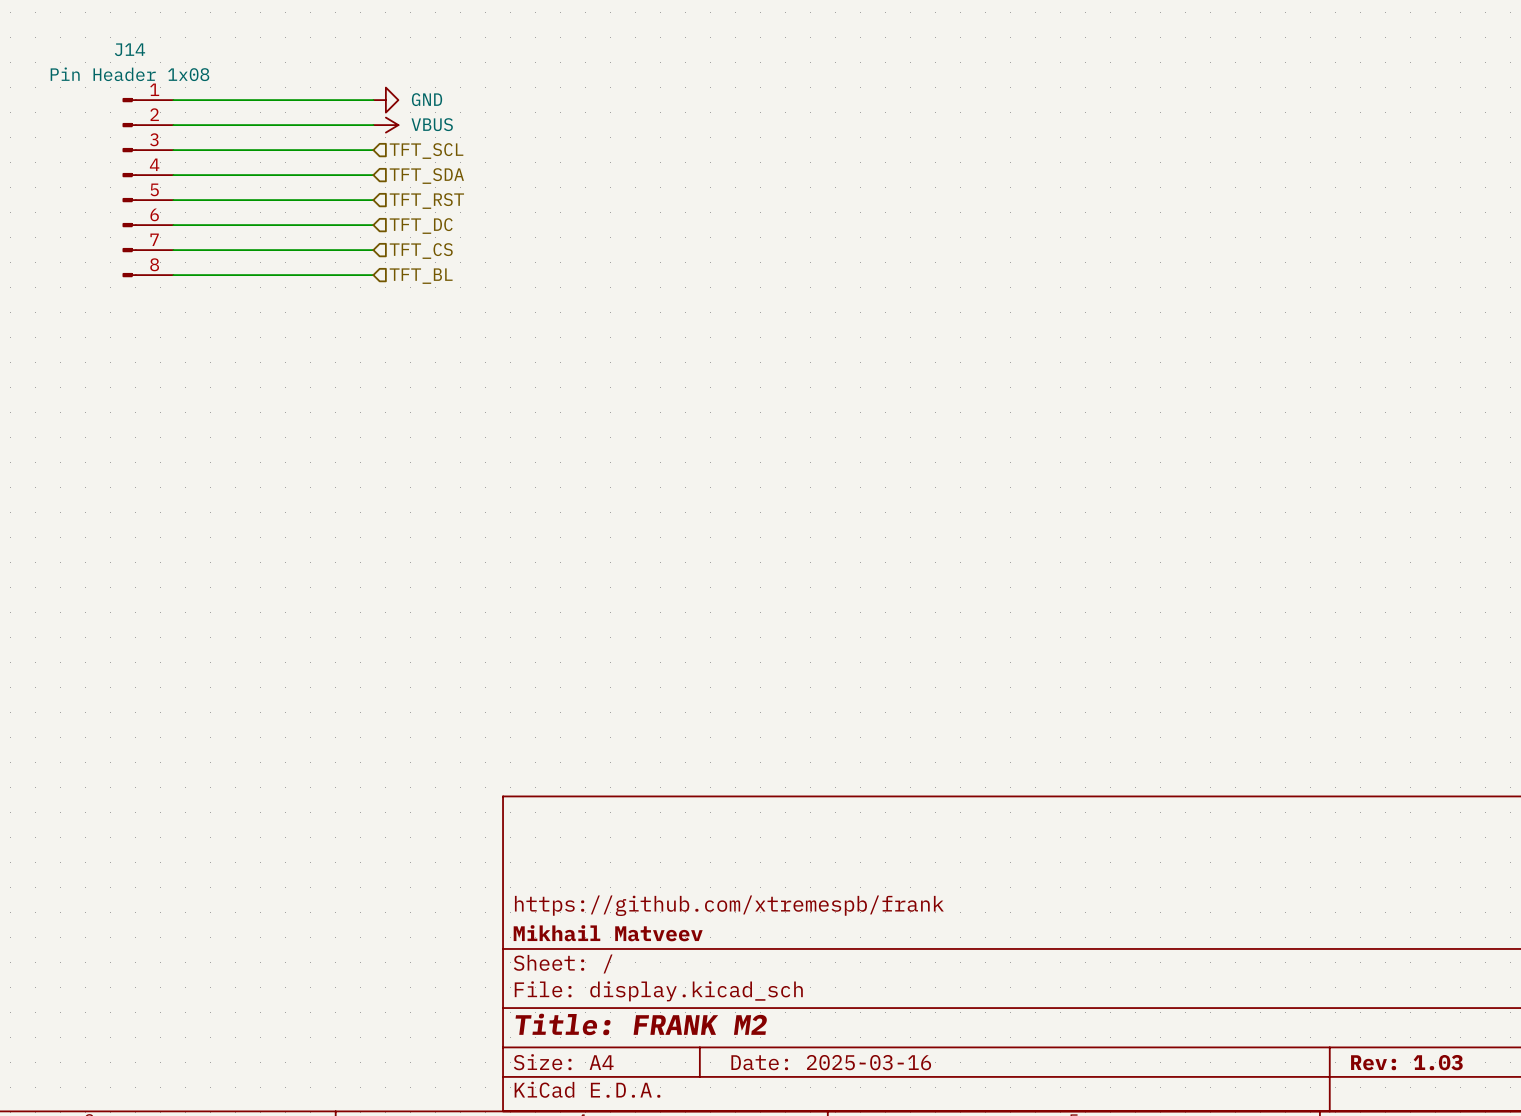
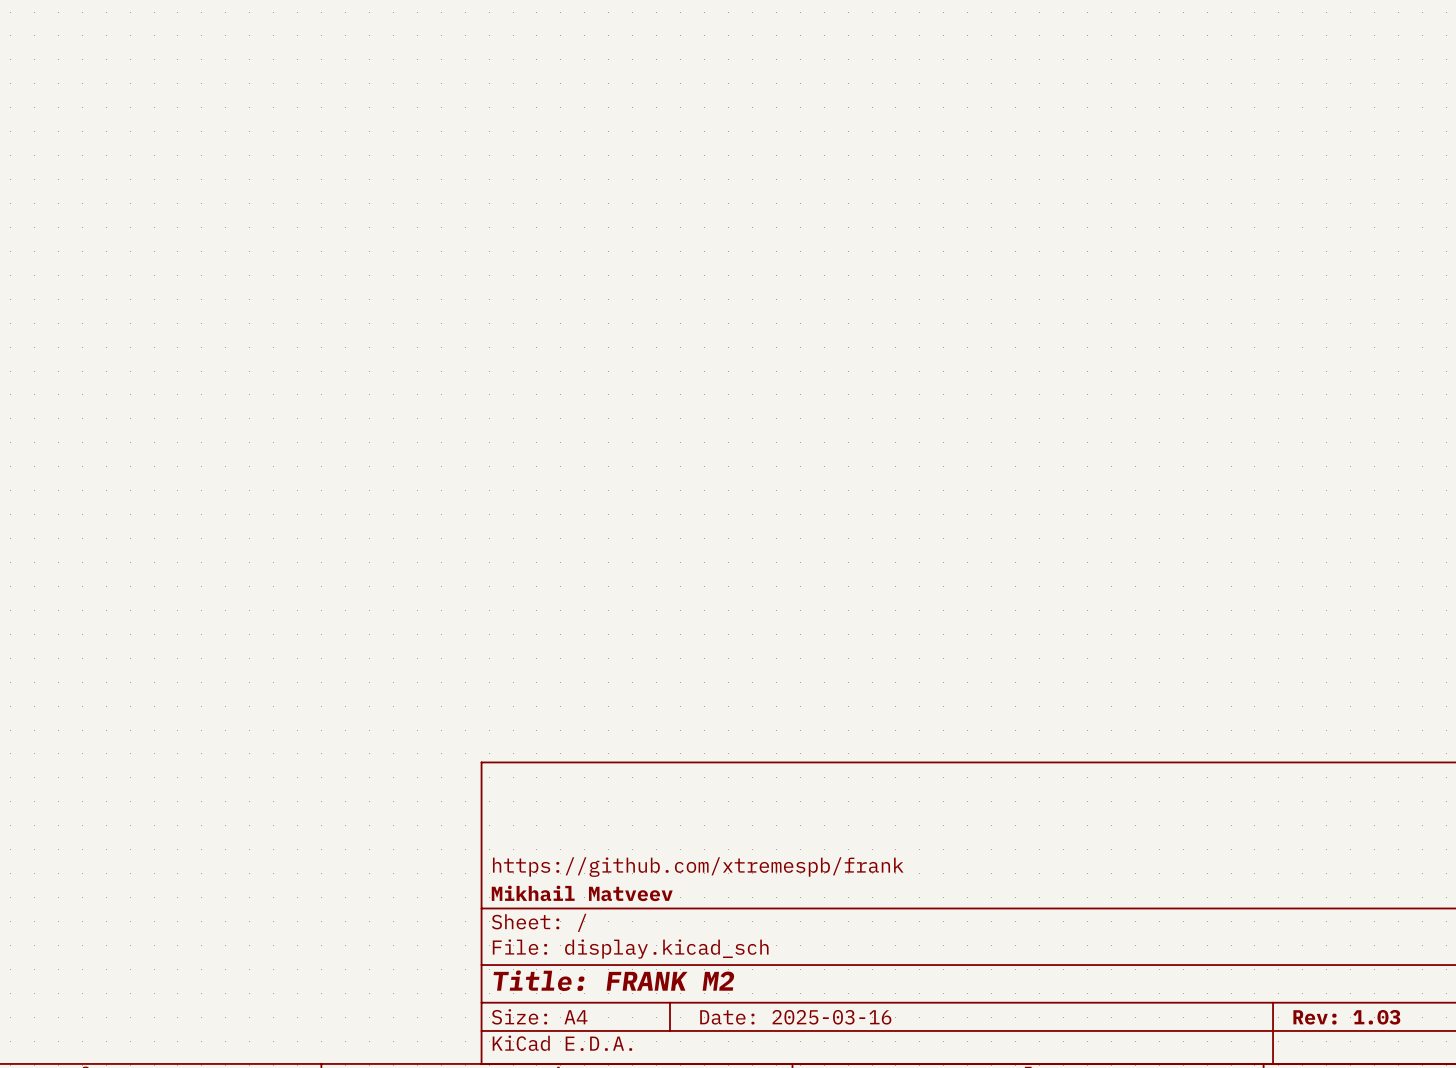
wire: (173, 100) (373, 100) -> none
power symbol: GND (385, 100) -> none
wire: (173, 125) (373, 125) -> none
power symbol: VBUS (385, 125) -> none
wire: (173, 150) (373, 150) -> none
hierarchical label: TFT_SCL (426, 151) -> none
wire: (173, 175) (373, 175) -> none
hierarchical label: TFT_SDA (426, 176) -> none
J14: Pin Header 1x08 (148, 187) -> none
wire: (173, 200) (373, 200) -> none
hierarchical label: TFT_RST (426, 201) -> none
wire: (173, 225) (373, 225) -> none
hierarchical label: TFT_DC (421, 226) -> none
wire: (173, 250) (373, 250) -> none
hierarchical label: TFT_CS (421, 251) -> none
wire: (173, 275) (373, 275) -> none
hierarchical label: TFT_BL (421, 276) -> none

